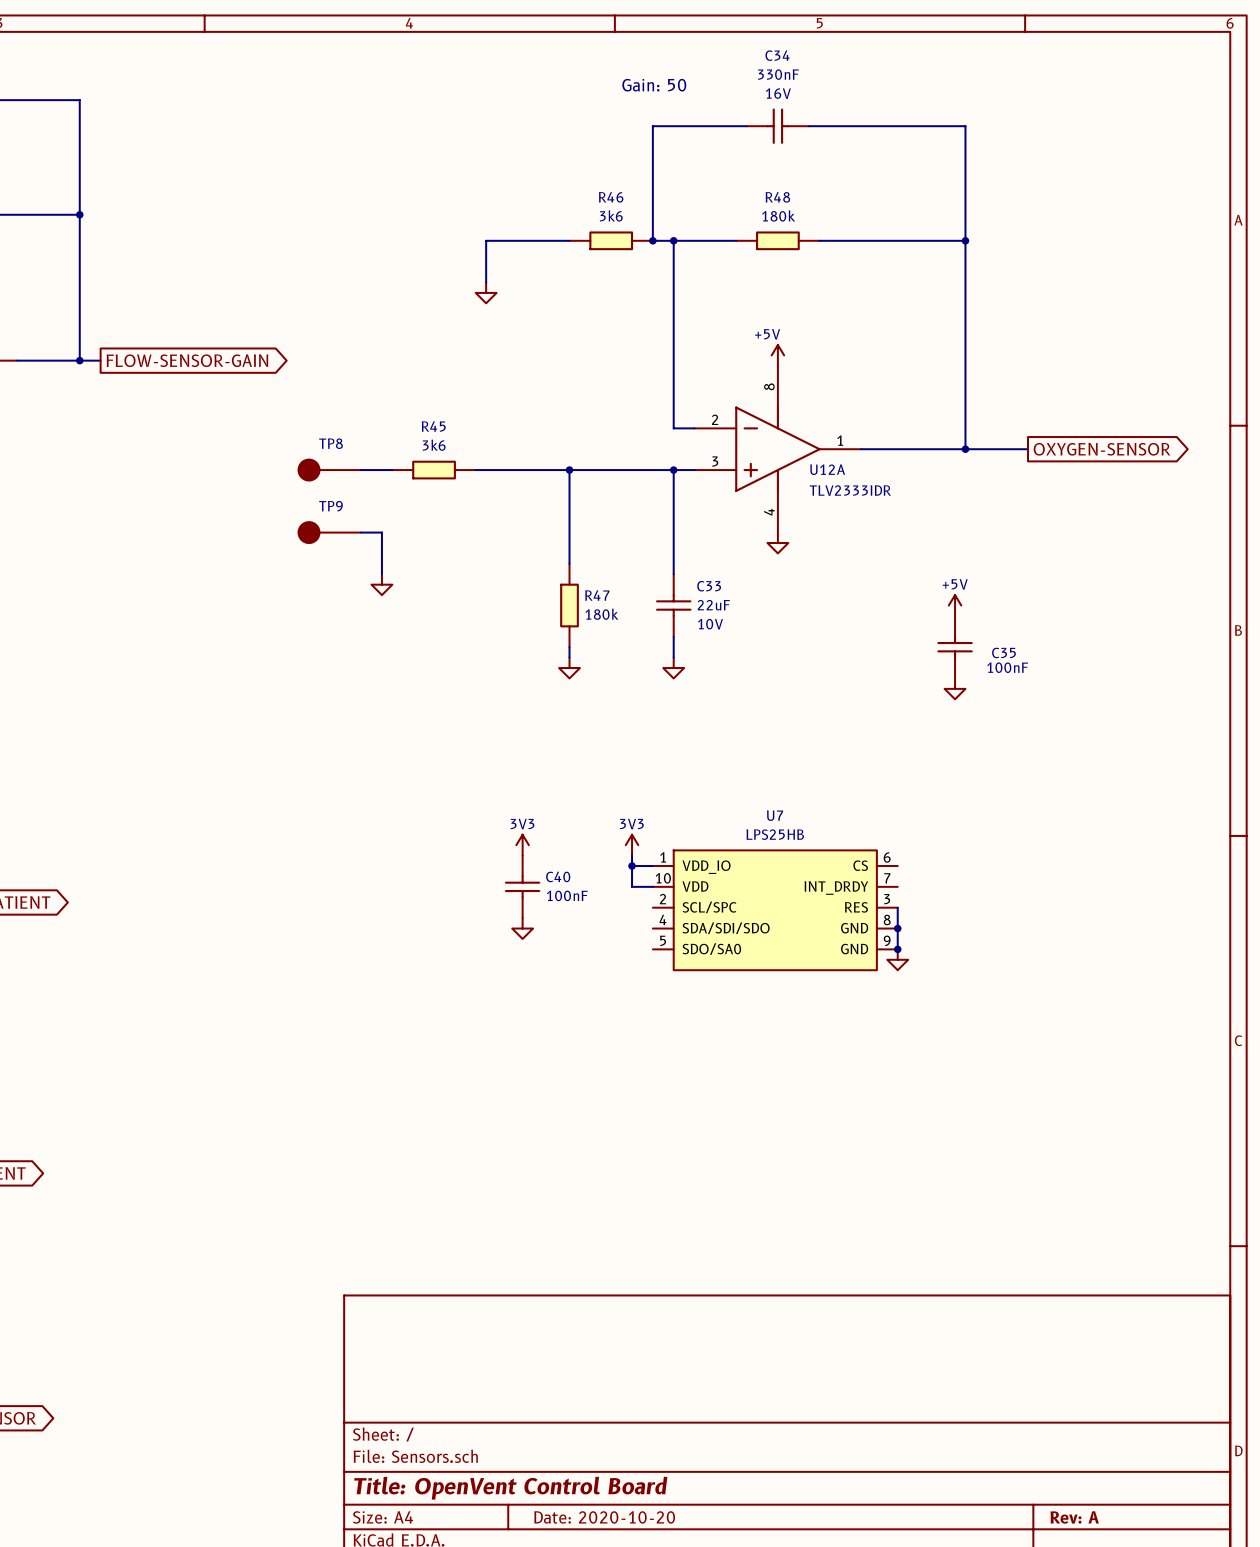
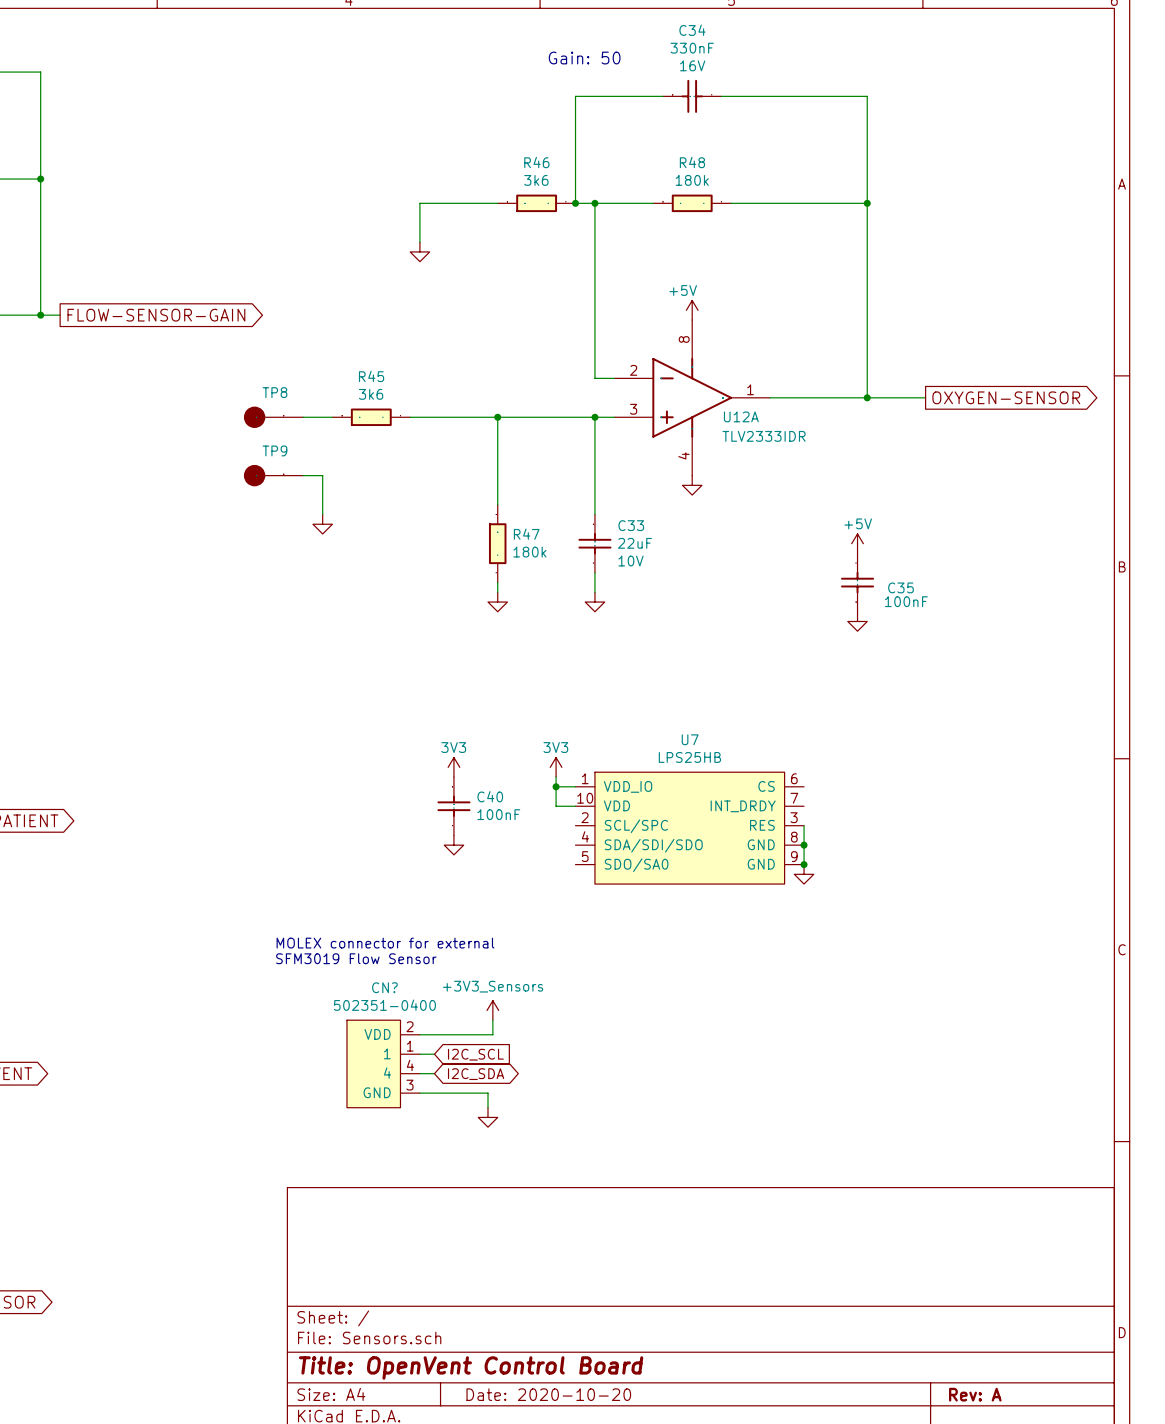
text: none -> MOLEX connector for external (385, 943)
text: none -> SFM3019 Flow Sensor (356, 958)
power symbol: none -> +3V3_Sensors (492, 1010)
wire: none -> (492, 1020) (492, 1034) (419, 1034)
wire: none -> (419, 1054) (434, 1054)
global label: none -> I2C_SCL (475, 1054)
CN?: none -> 502351-0400 (383, 1063)
wire: none -> (419, 1073) (434, 1073)
global label: none -> I2C_SDA (476, 1074)
wire: none -> (419, 1093) (488, 1093) (488, 1107)
power symbol: none -> (488, 1117)

